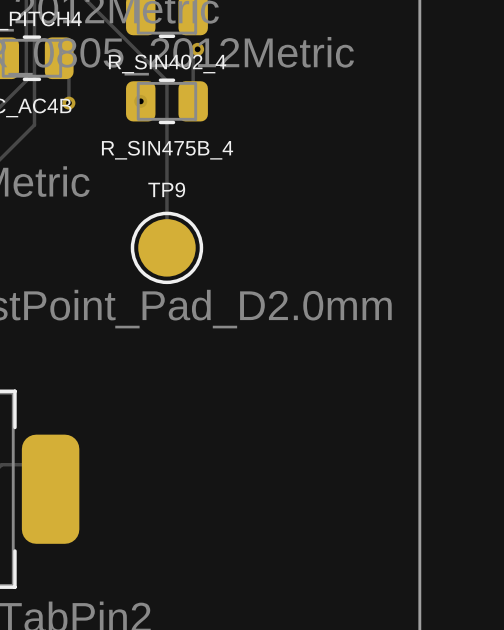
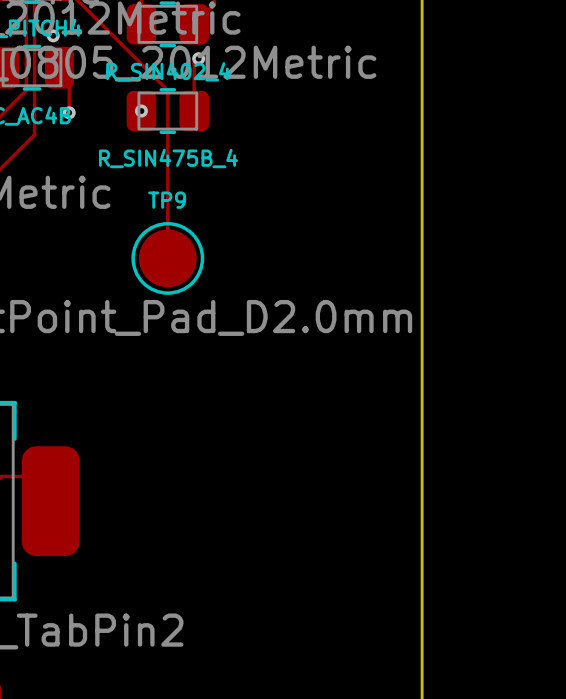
via: none -> (53, 35)

